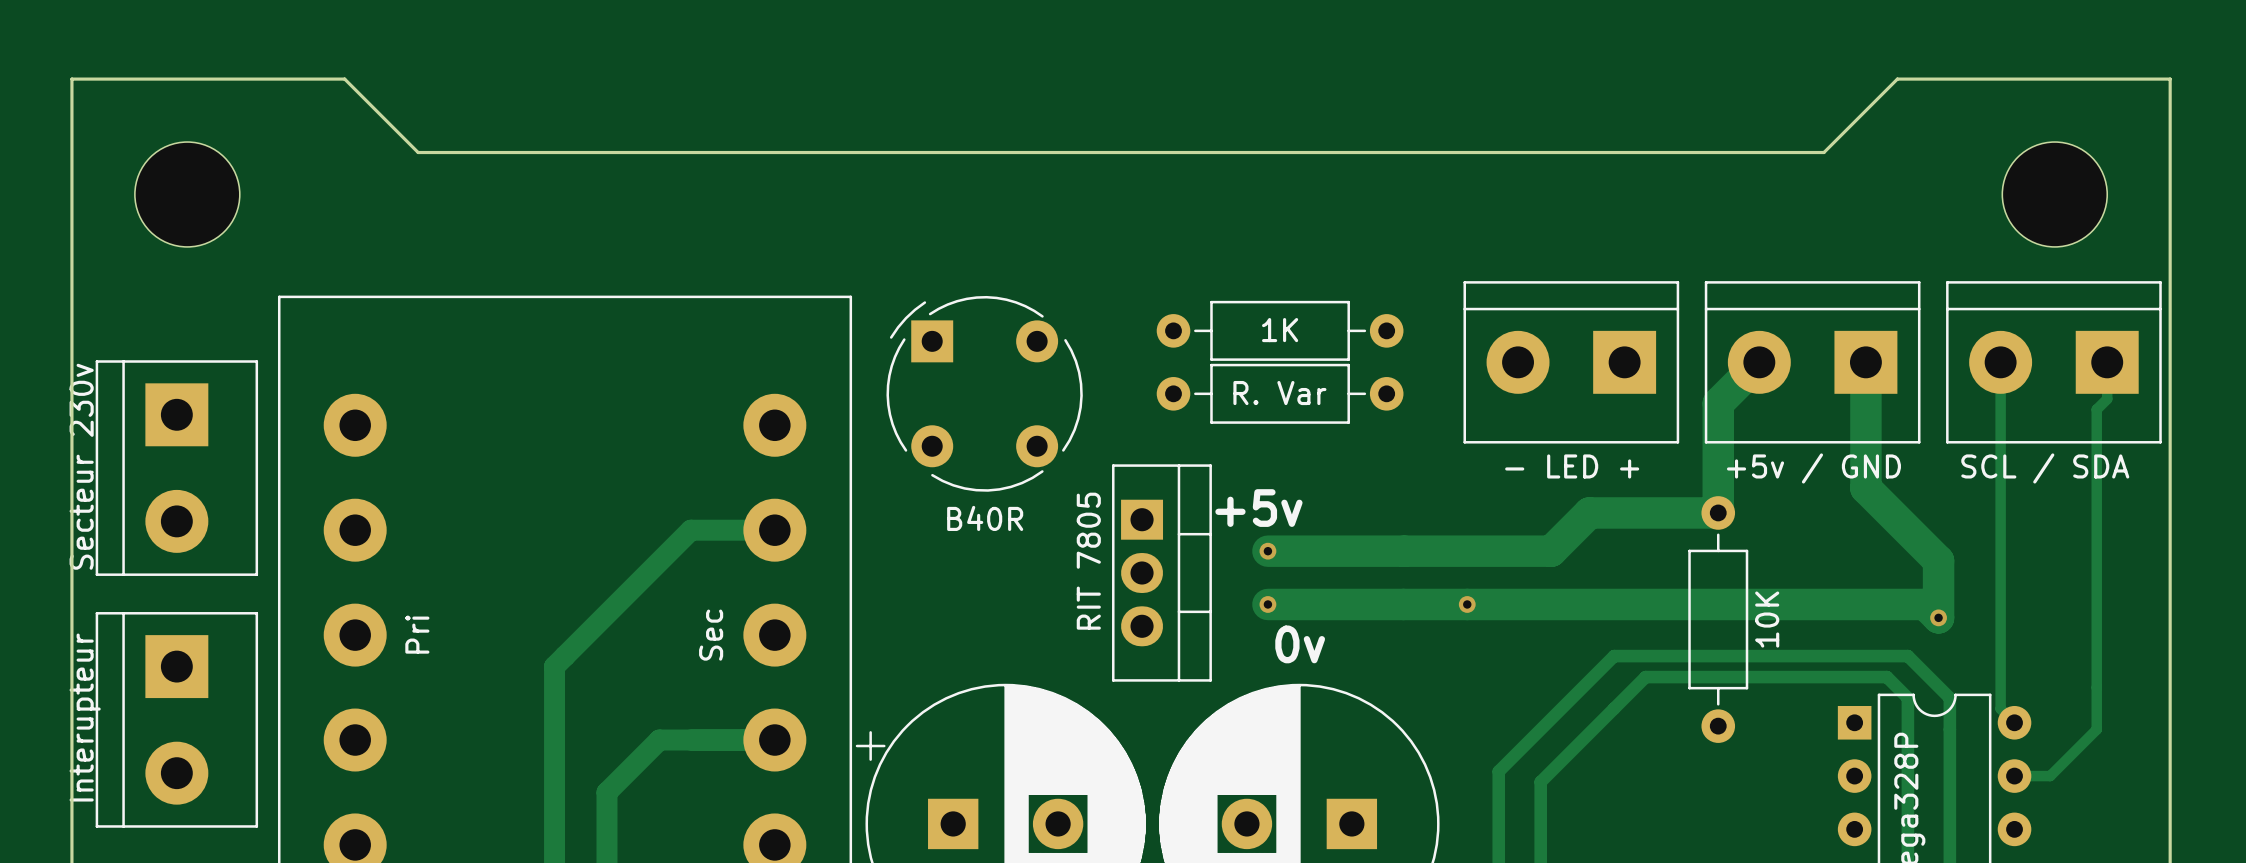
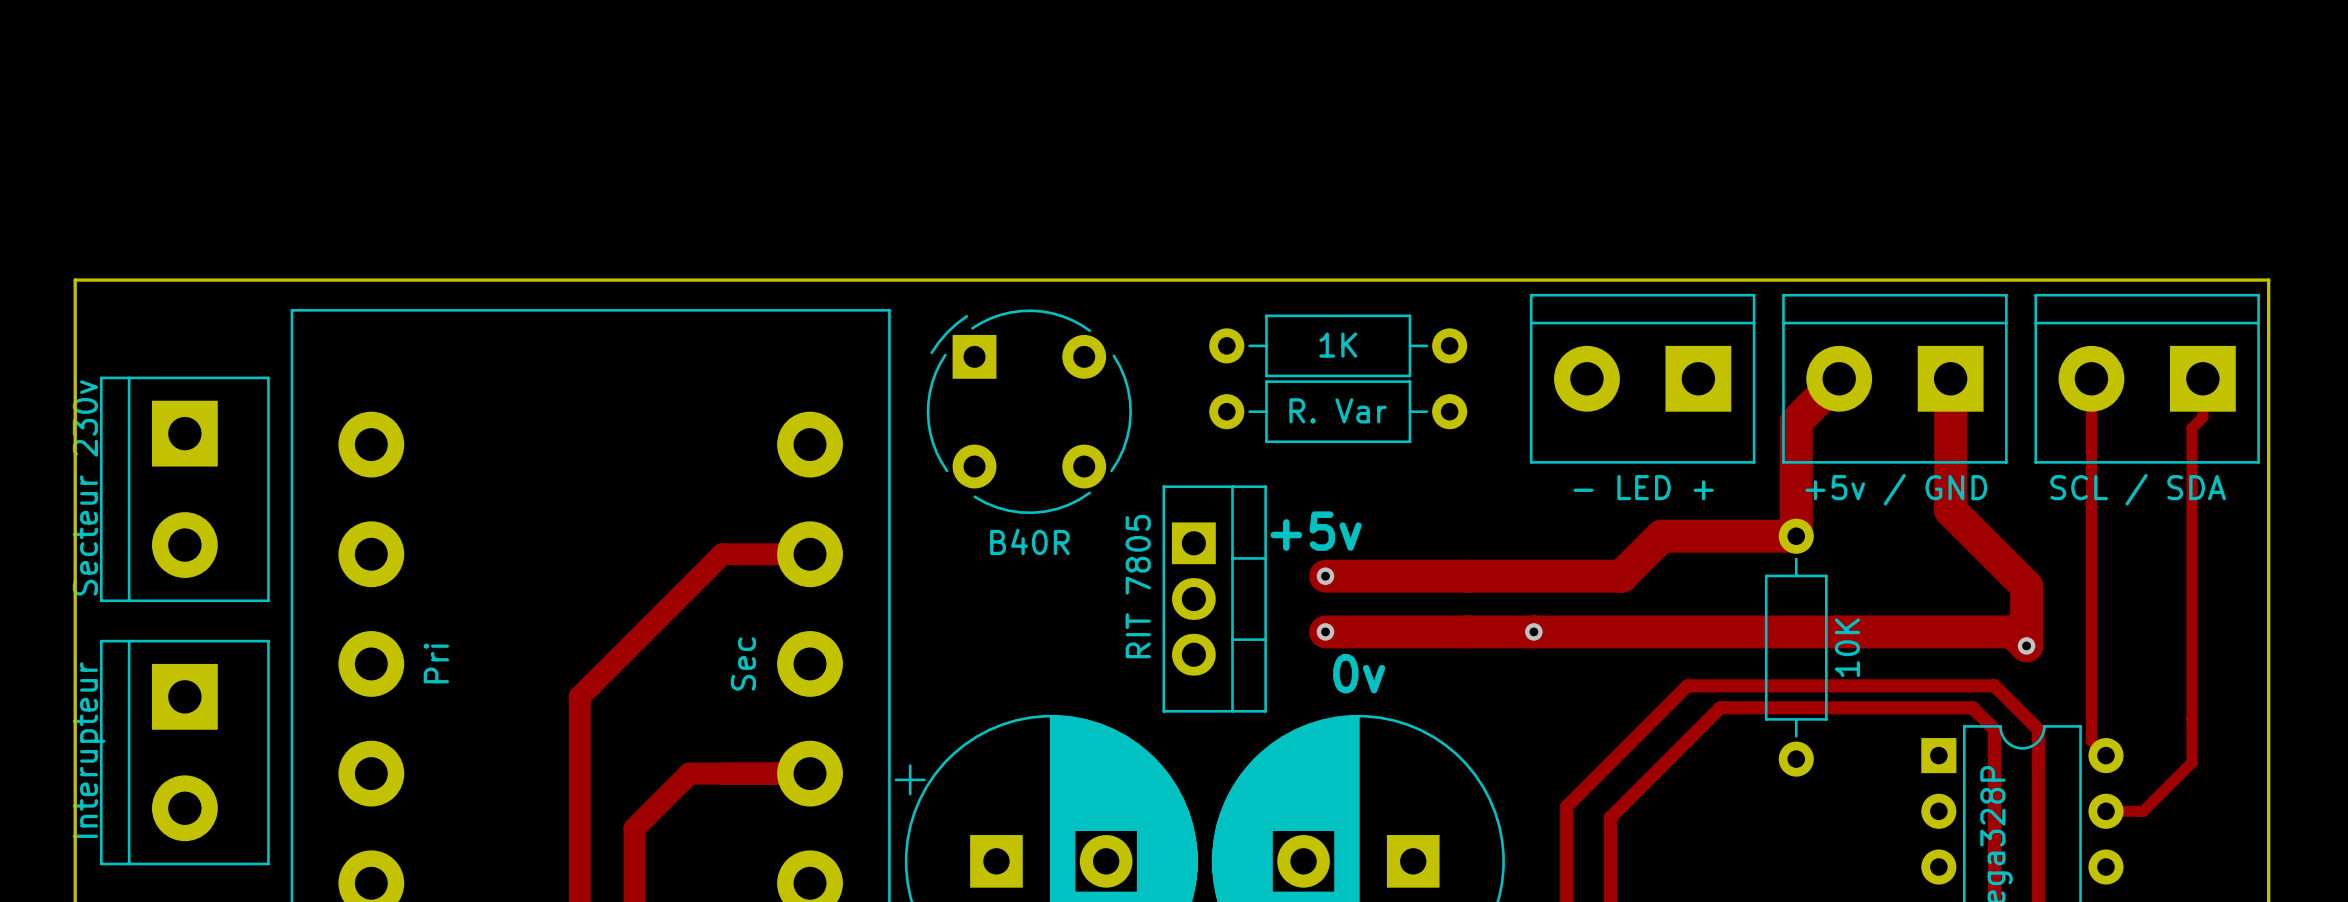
part: (187, 194) -> none
part: (2054, 194) -> none
board edge: (71, 267) (71, 79) (344, 79) (418, 152) (1823, 152) (1897, 79) (2170, 79) (2170, 267) -> (75, 280) (2268, 280)

